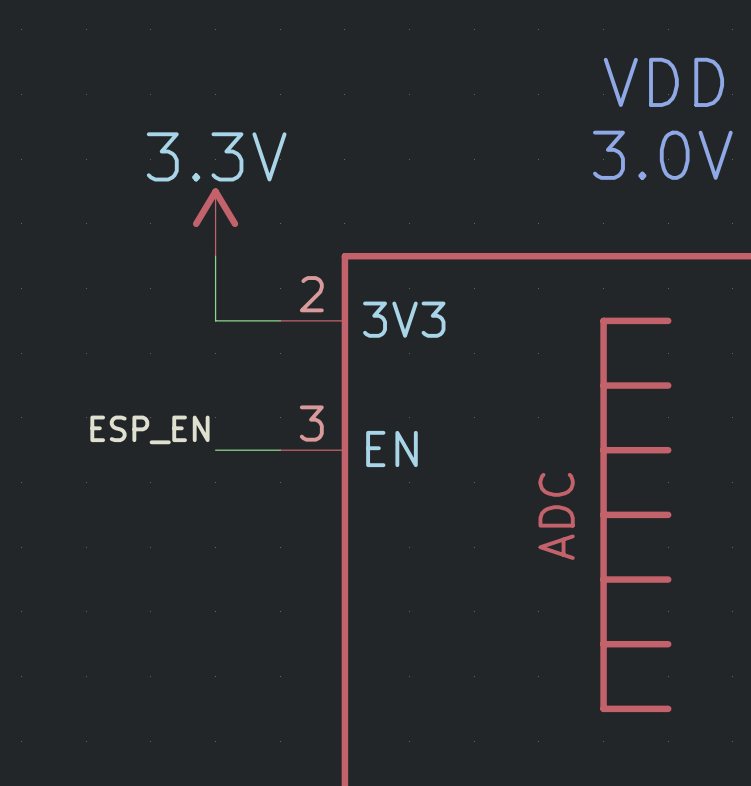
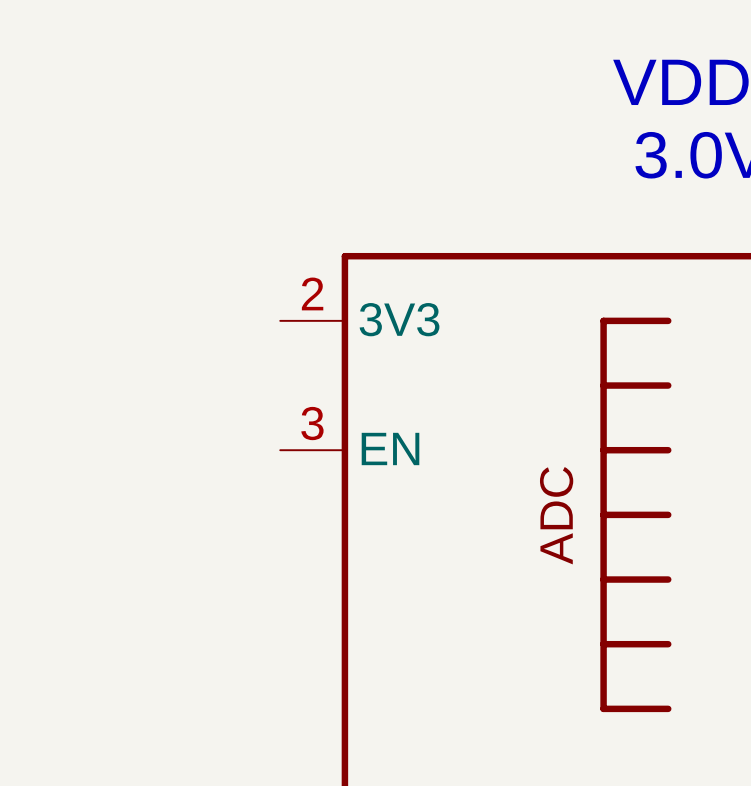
power symbol: 3.3V (215, 222) -> none
wire: (215, 256) (215, 320) (280, 320) -> none
label: ESP_EN (149, 429) -> none
wire: (215, 450) (280, 450) -> none

